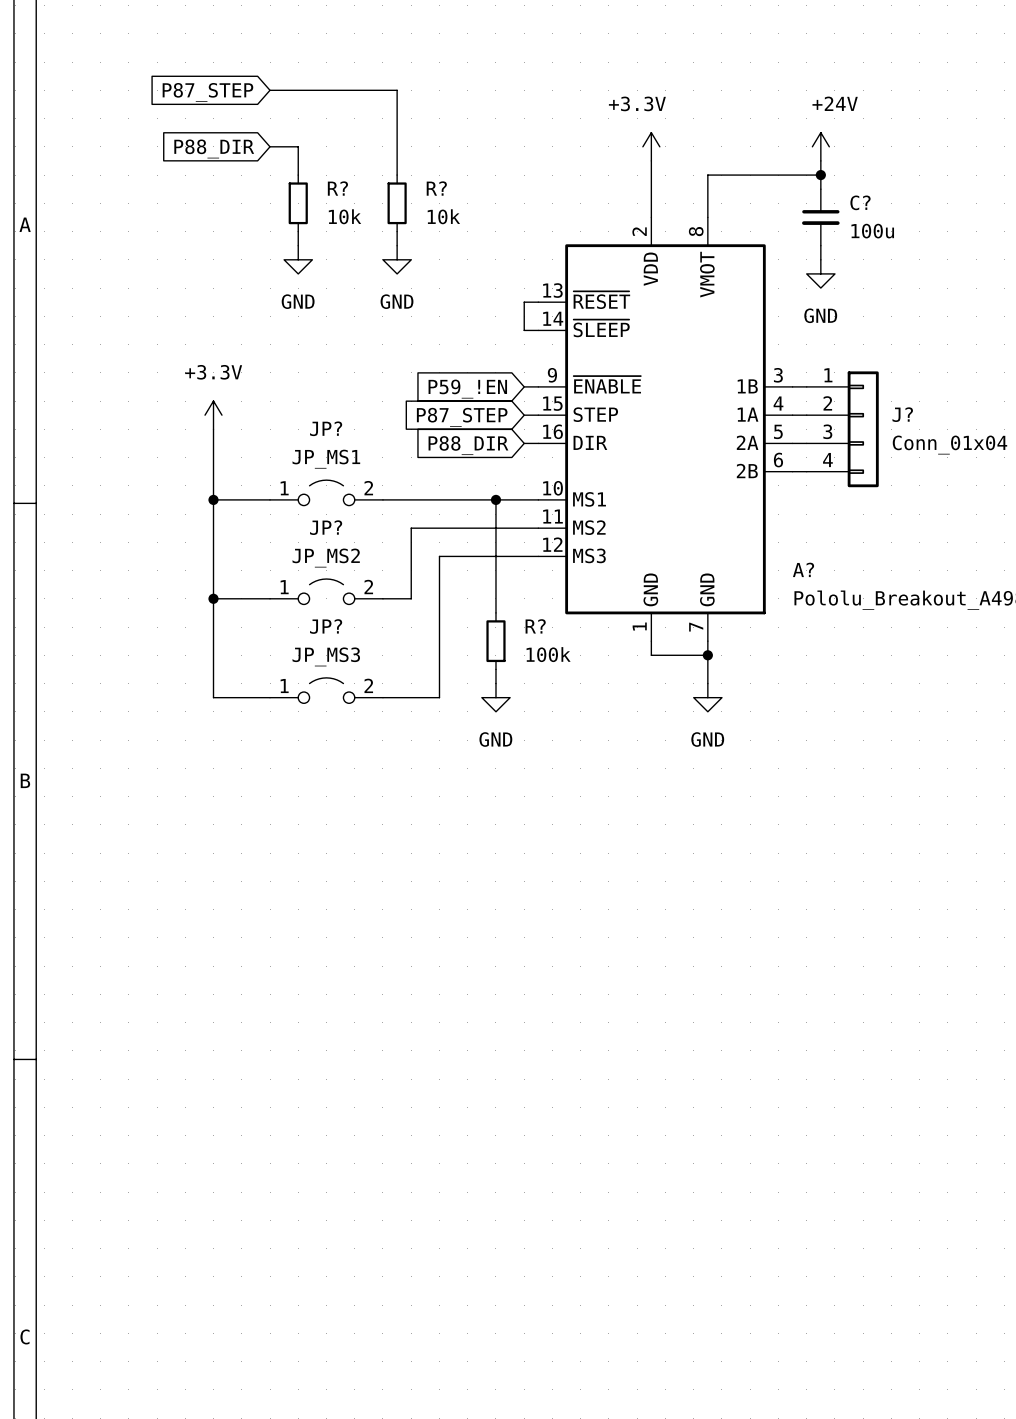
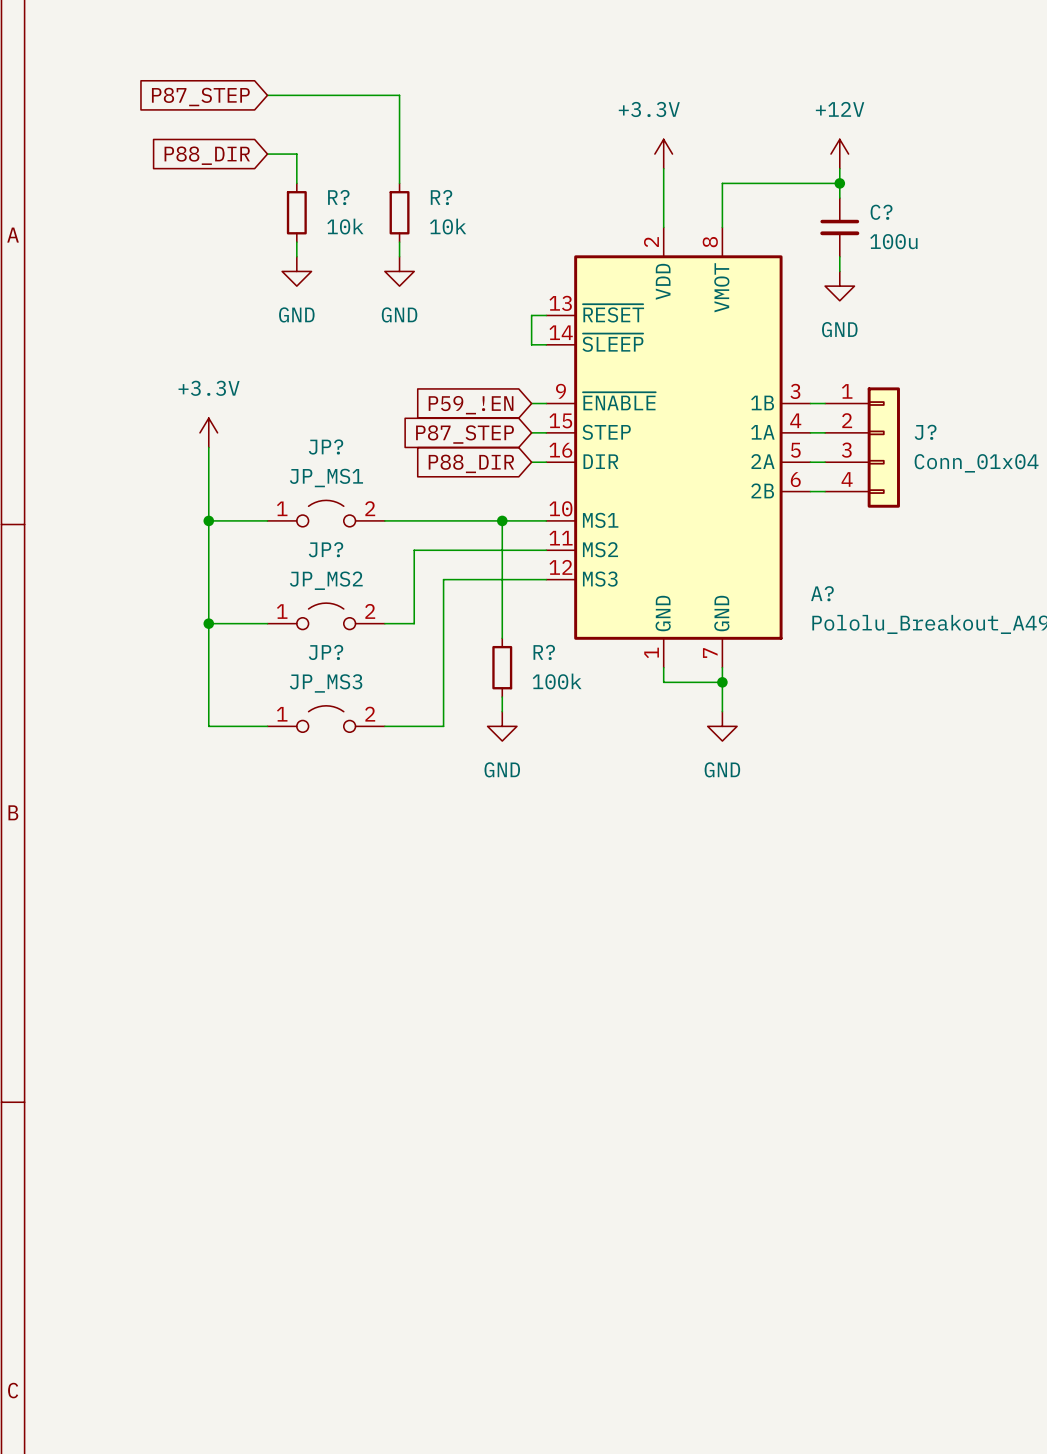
power symbol: +24V (820, 146) -> +12V (839, 154)

